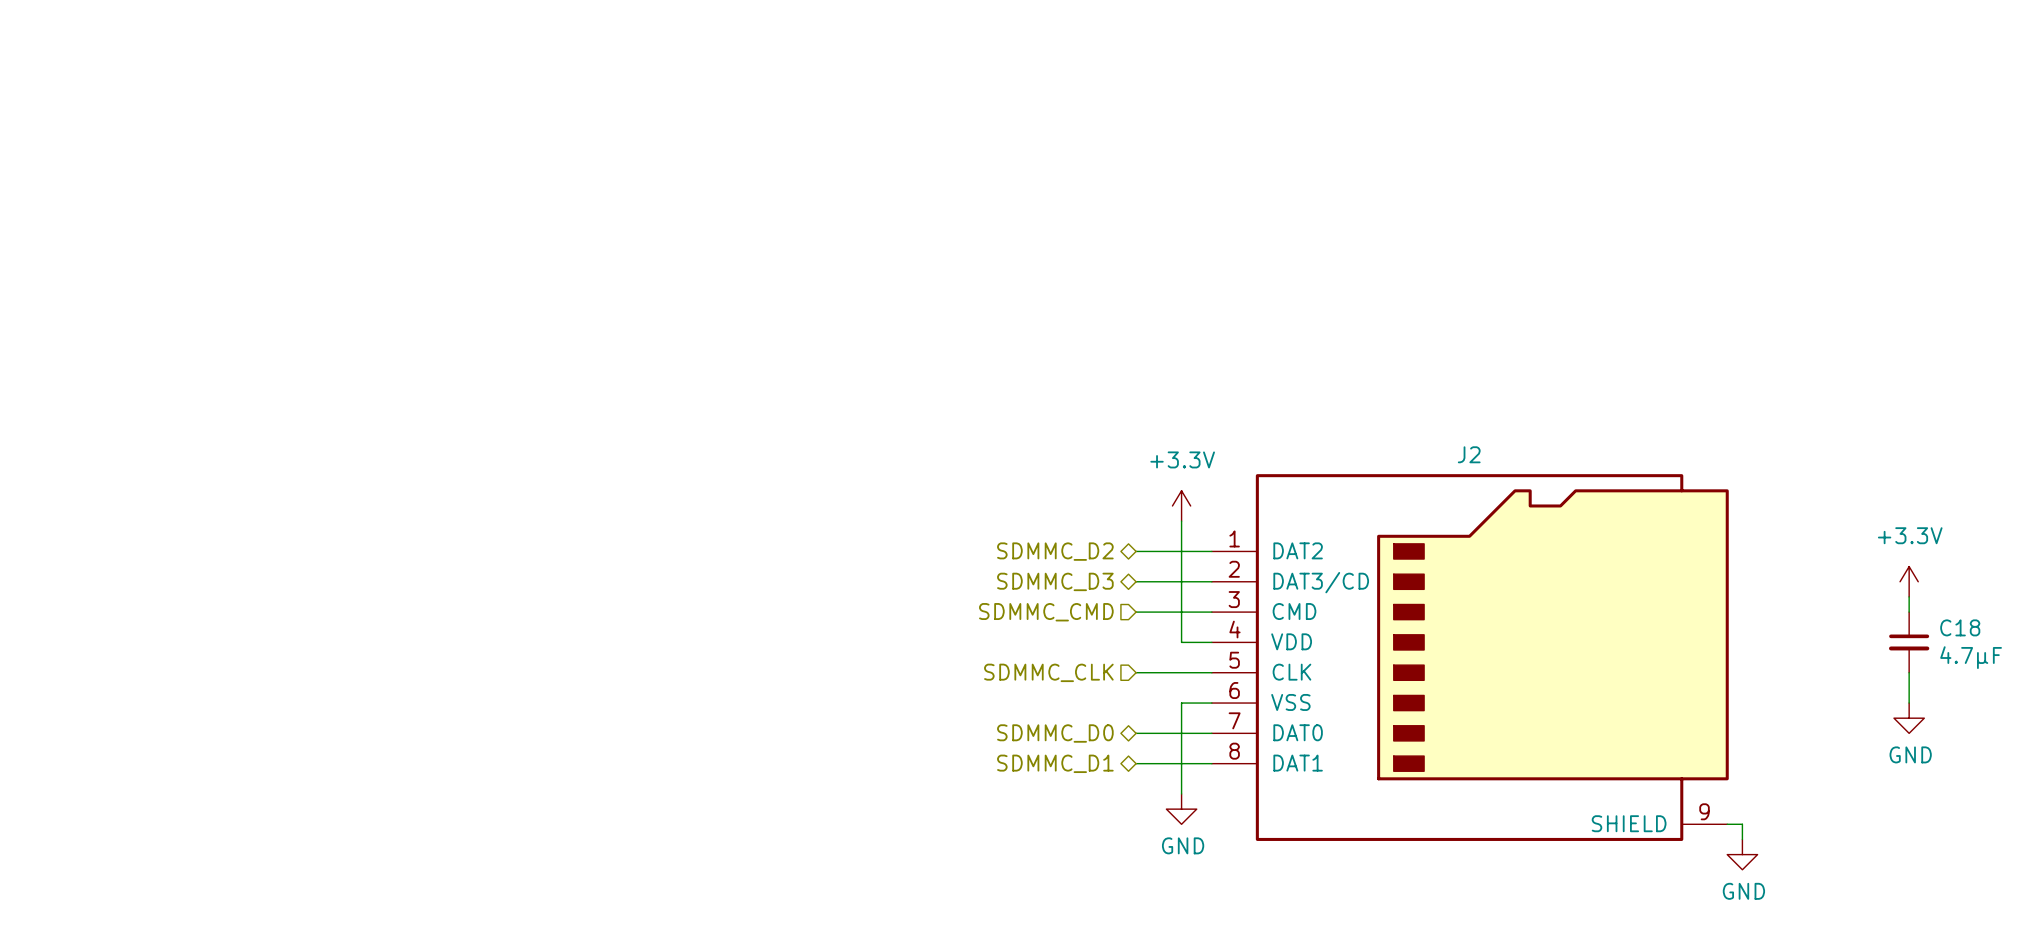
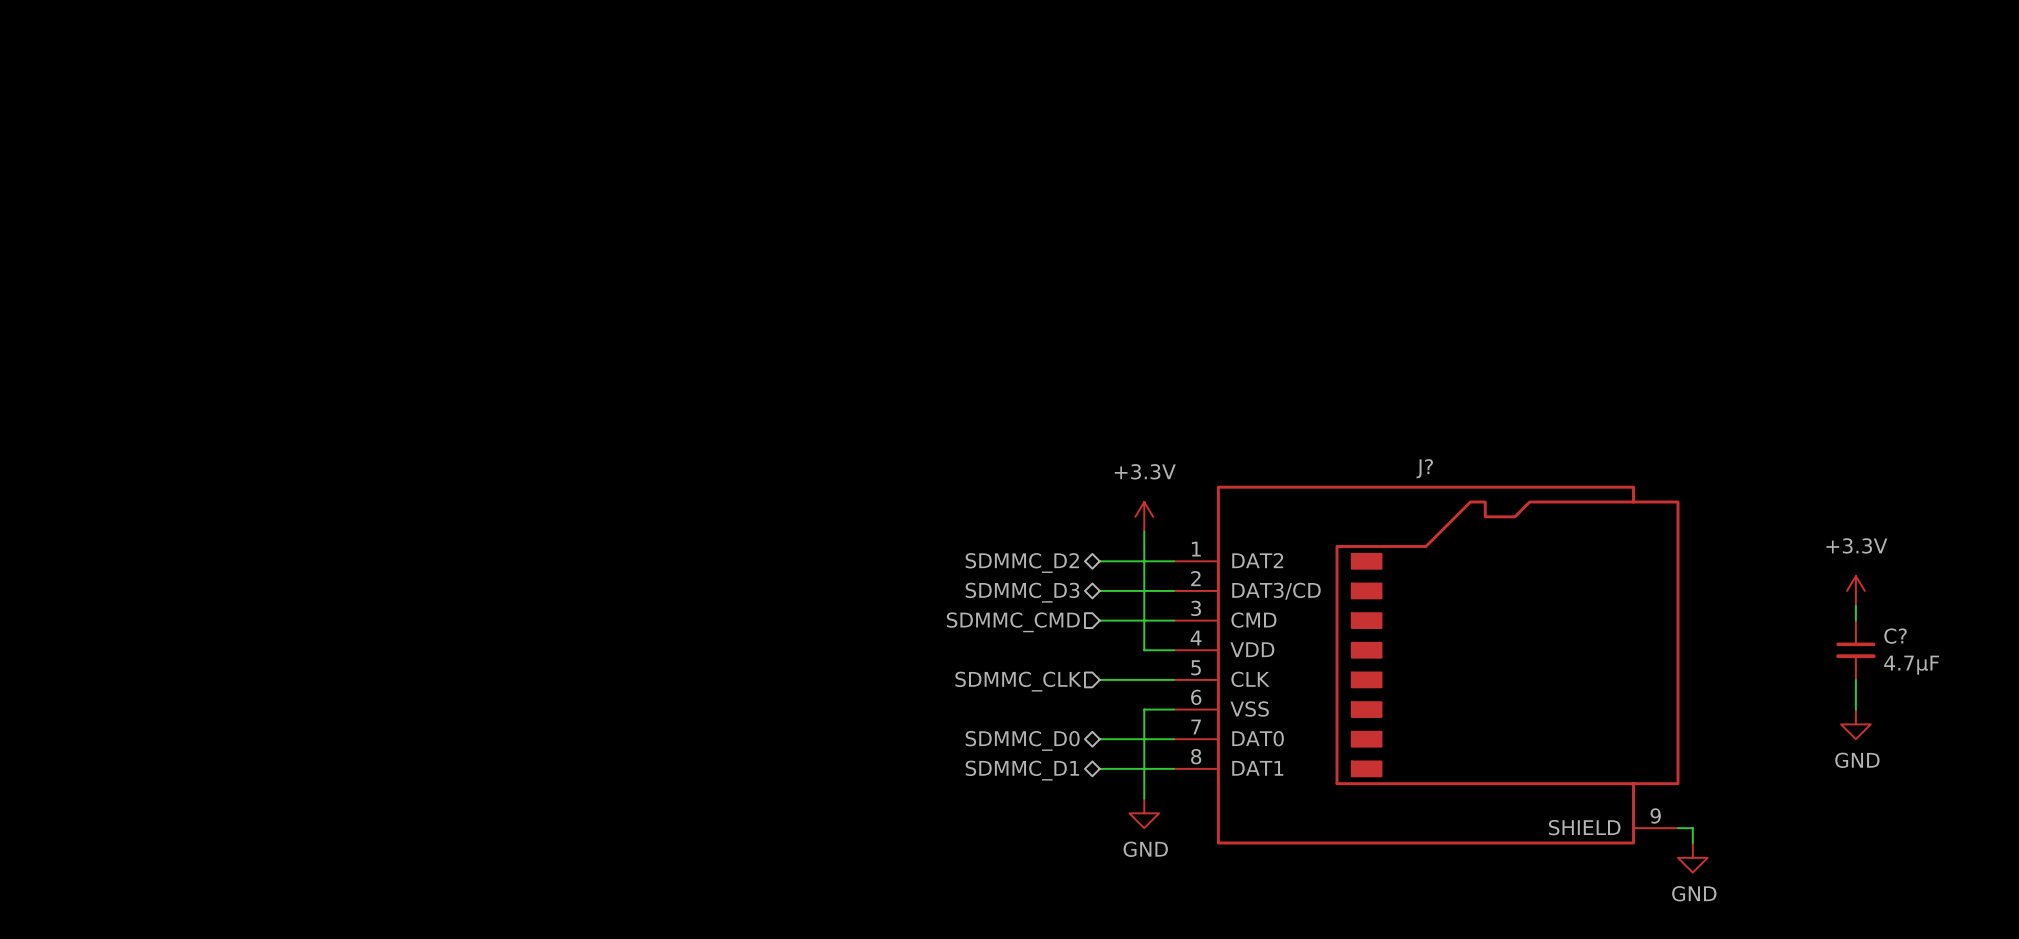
J2 name: J2 (1469, 454) -> J? (1424, 468)
C18 name: C18 (1960, 627) -> C? (1895, 636)

